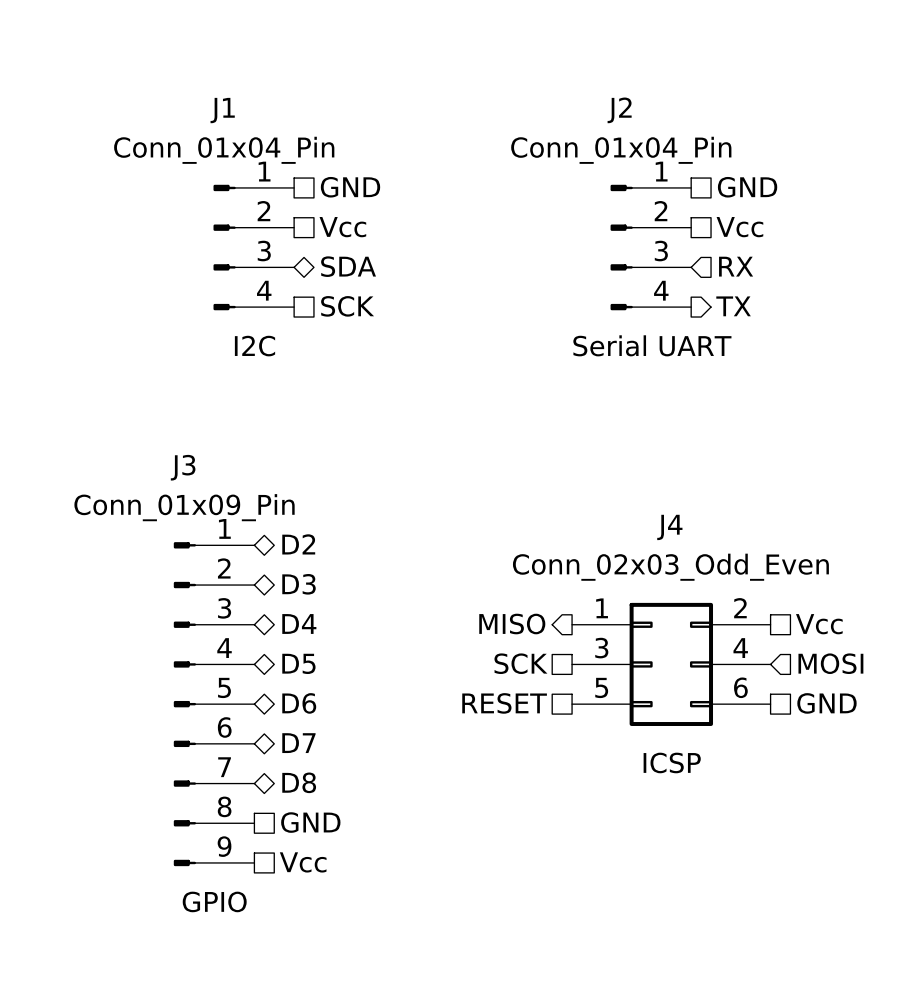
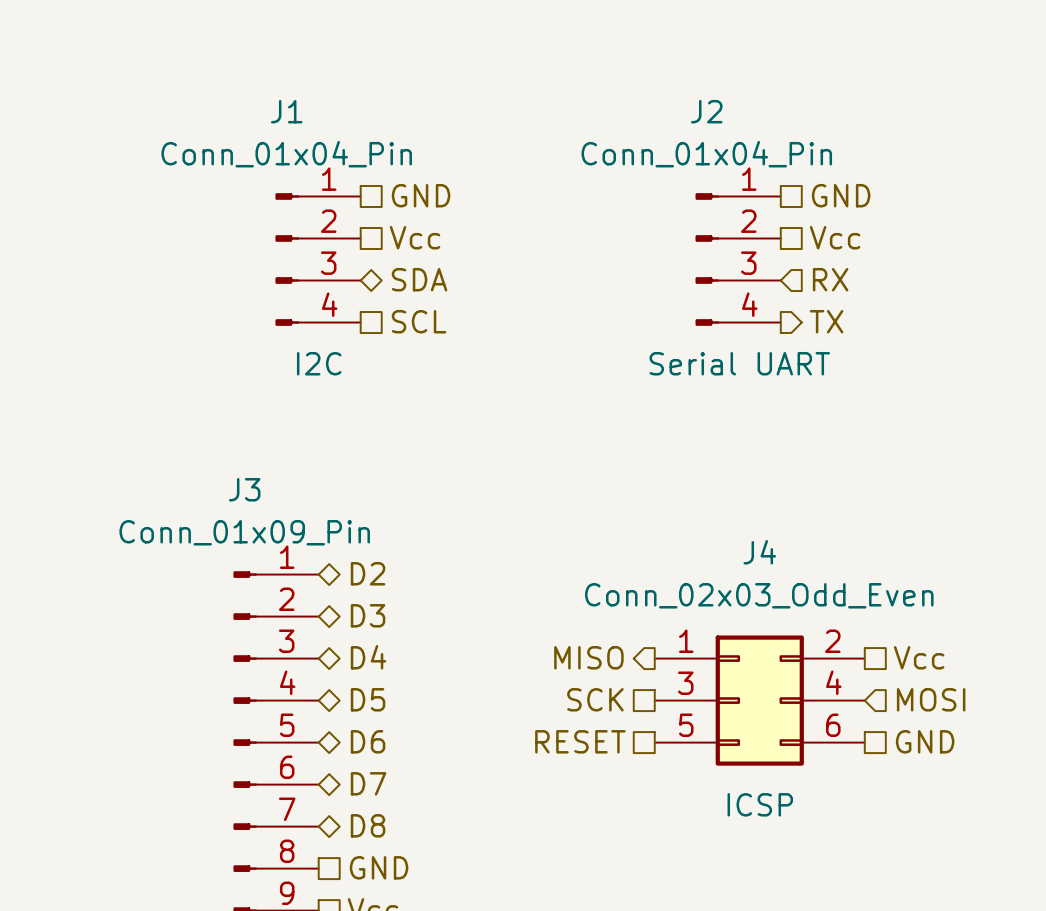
hierarchical label: SCK (347, 306) -> SCL (419, 321)

